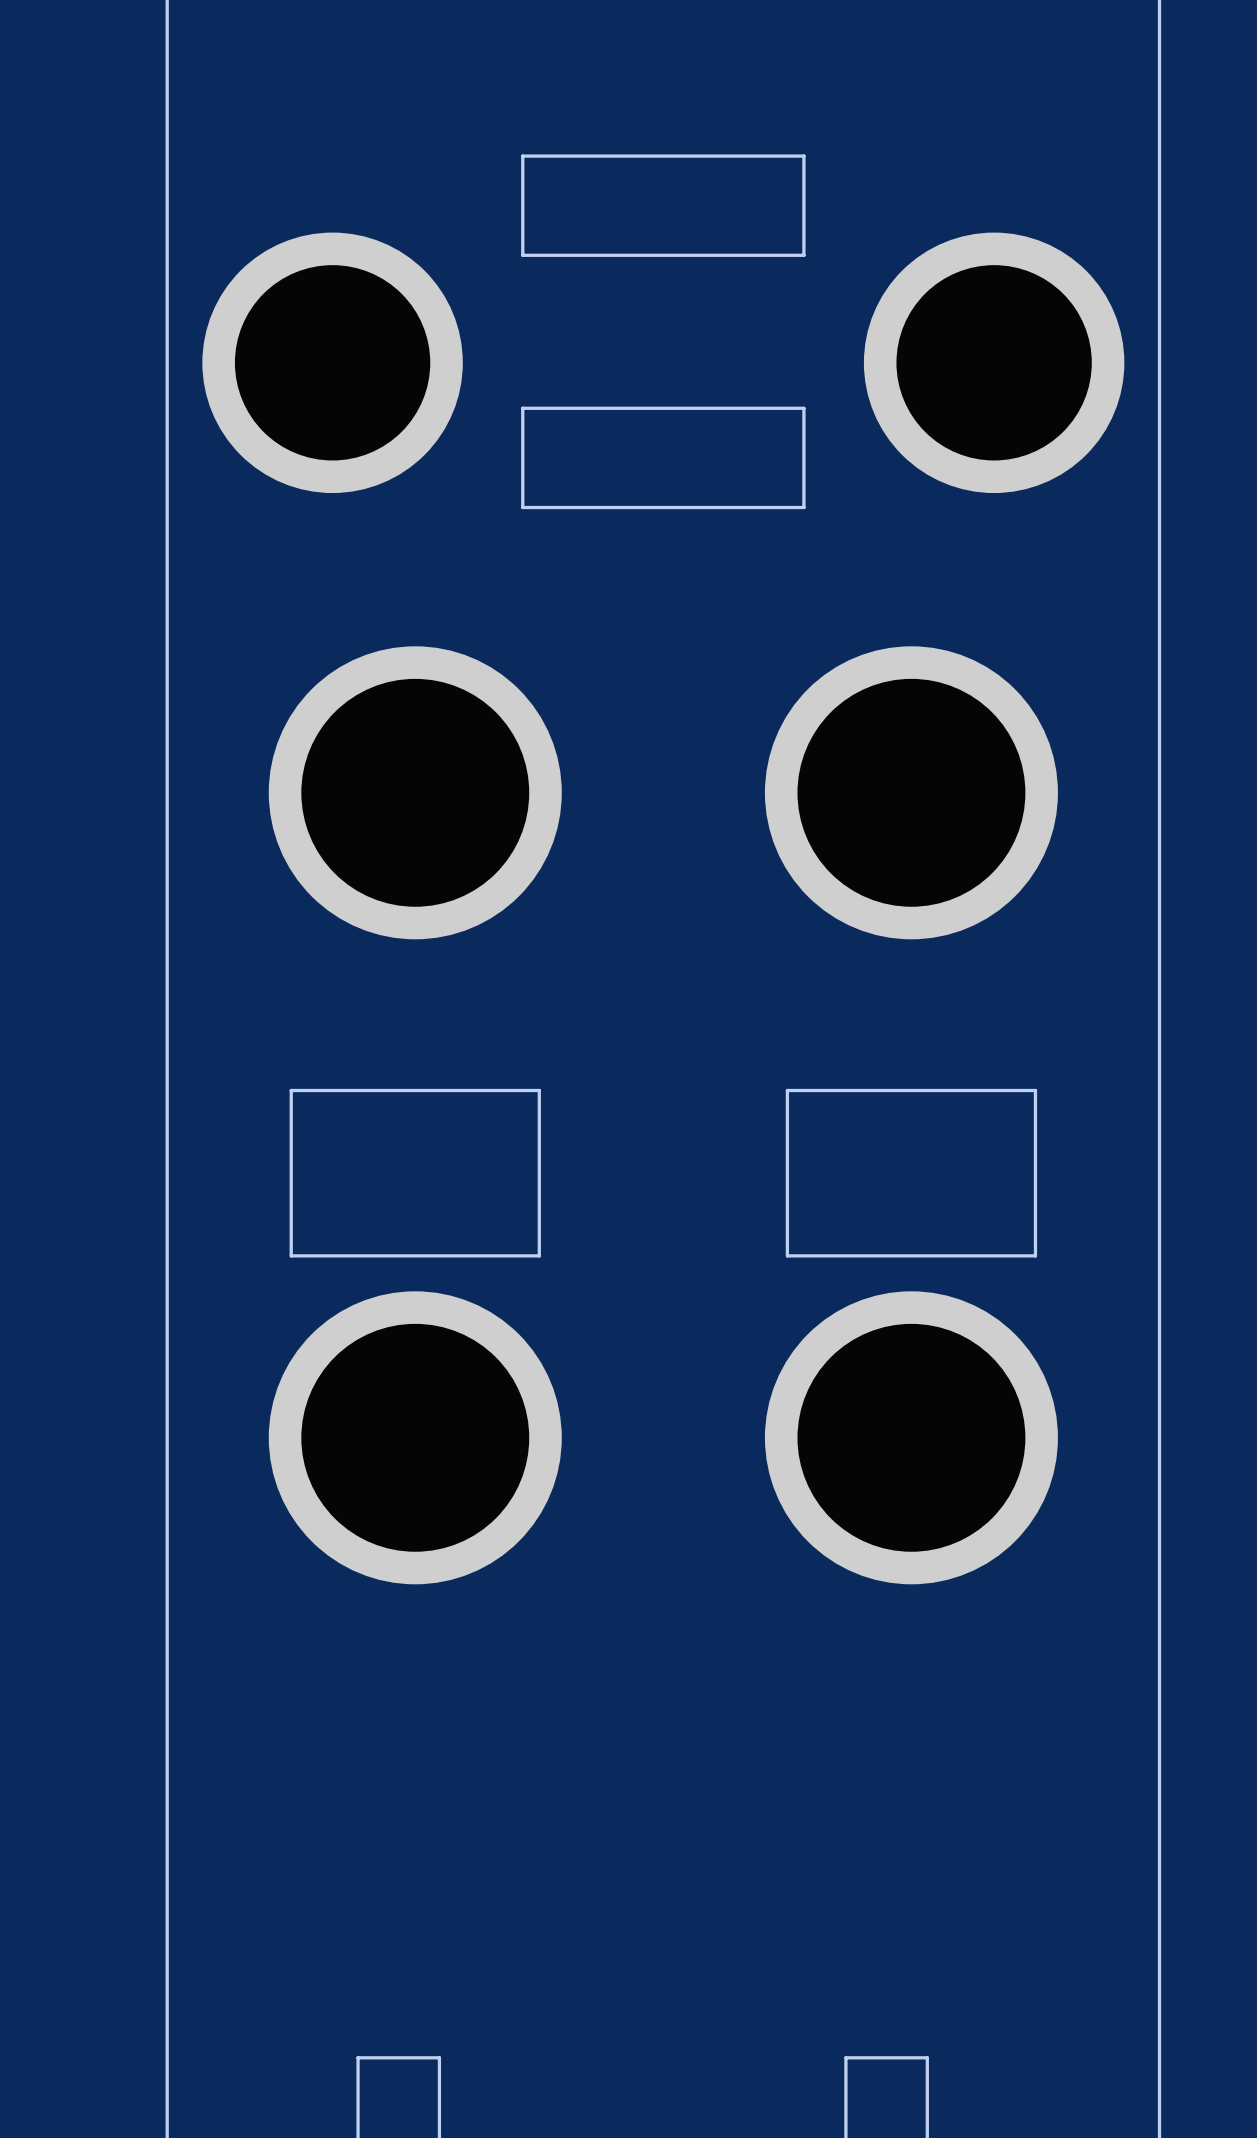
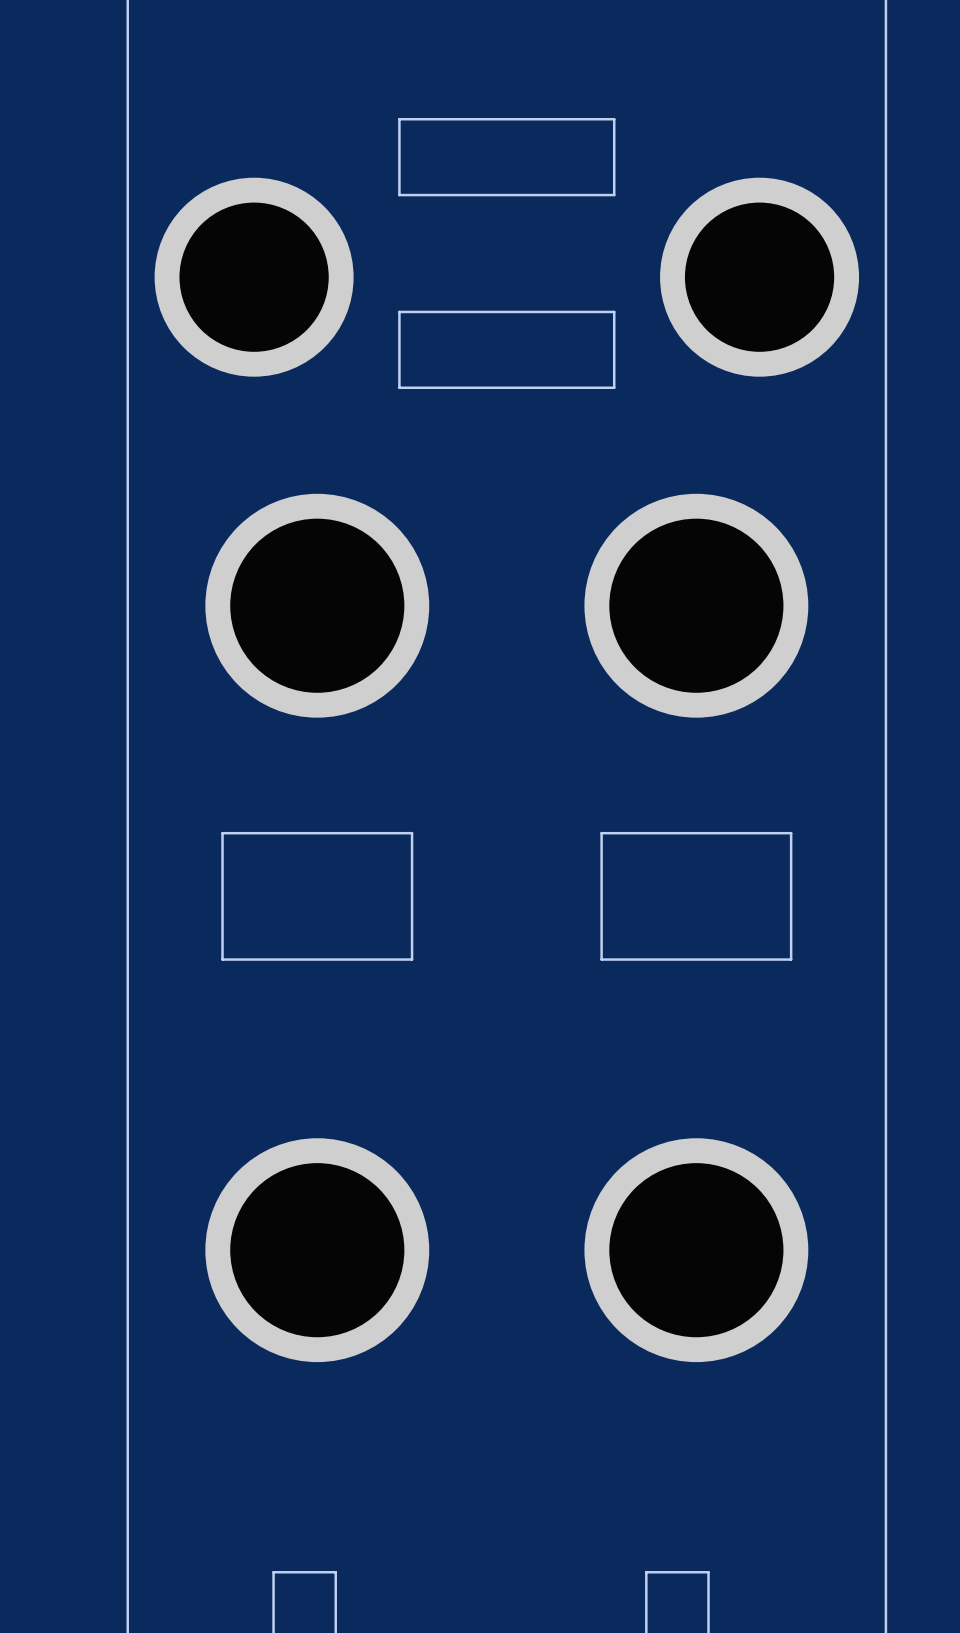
part position: (415, 1437) -> (317, 1250)
part position: (911, 1437) -> (696, 1250)

